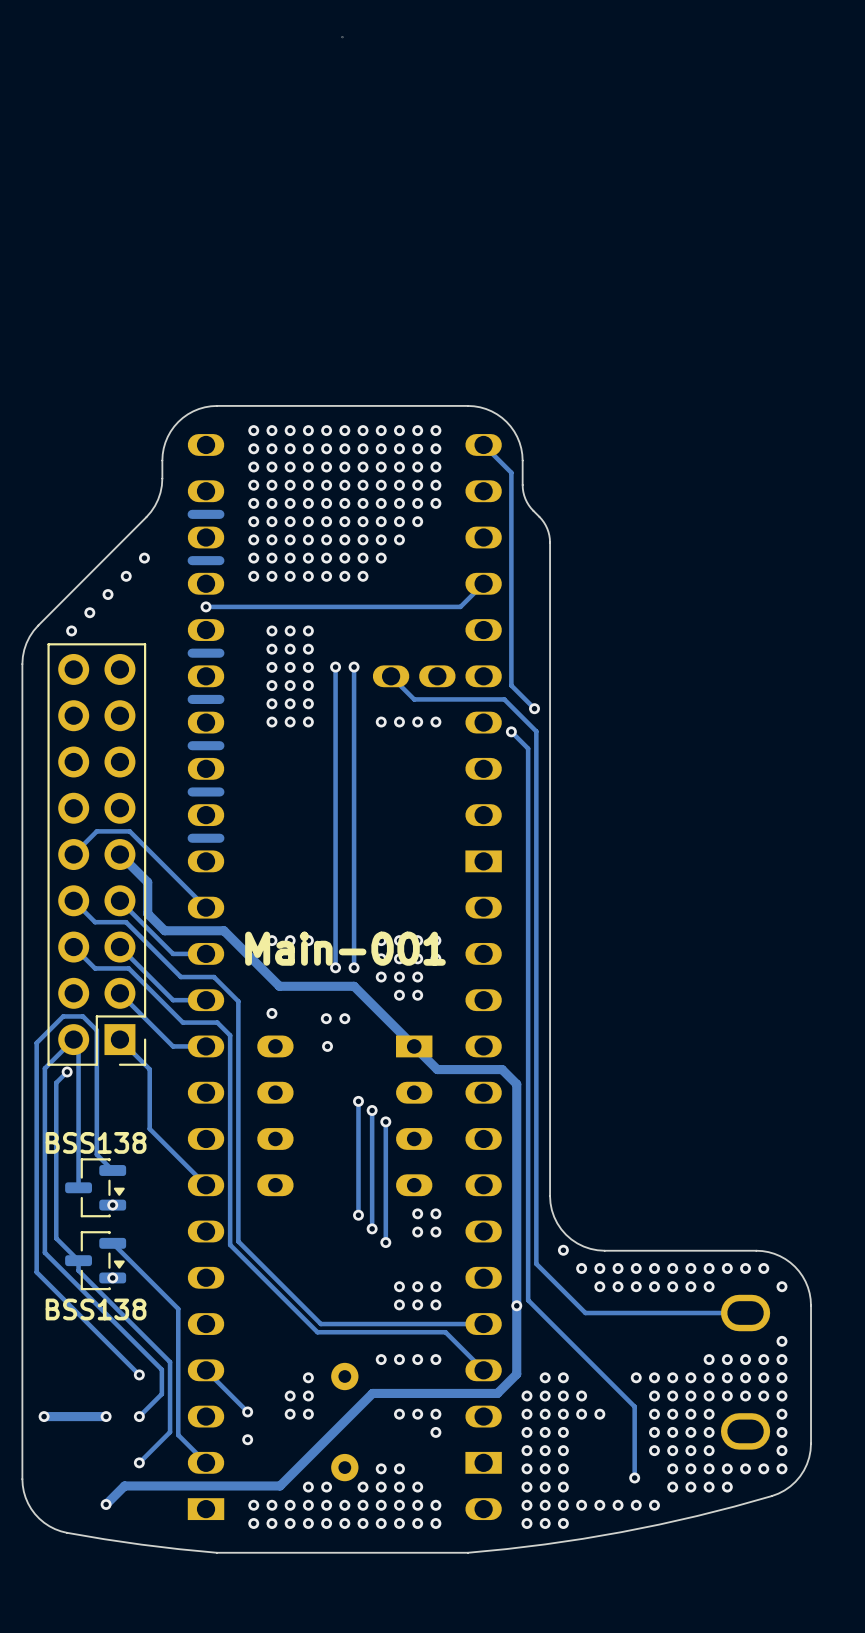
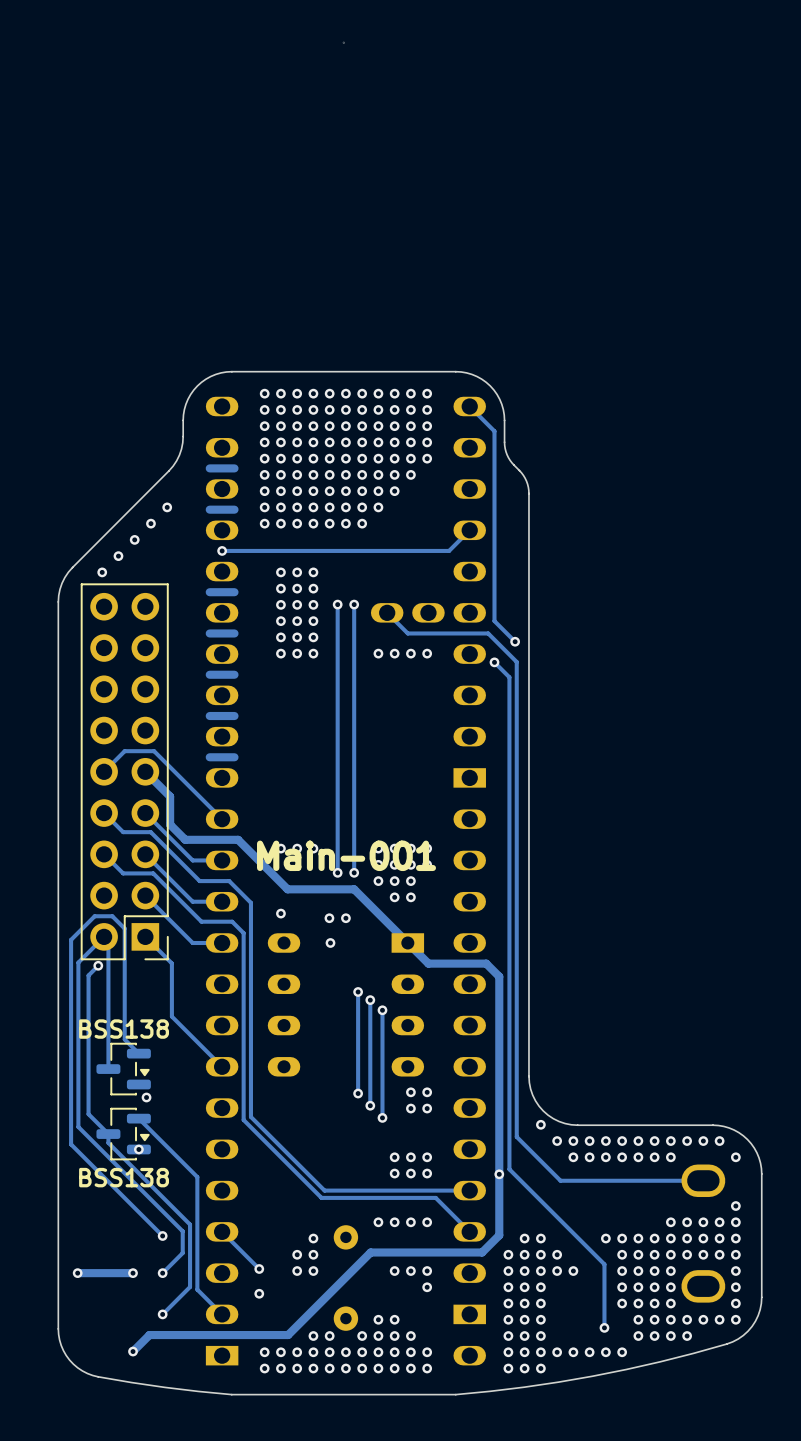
via position: (112, 1205) -> (146, 1097)

